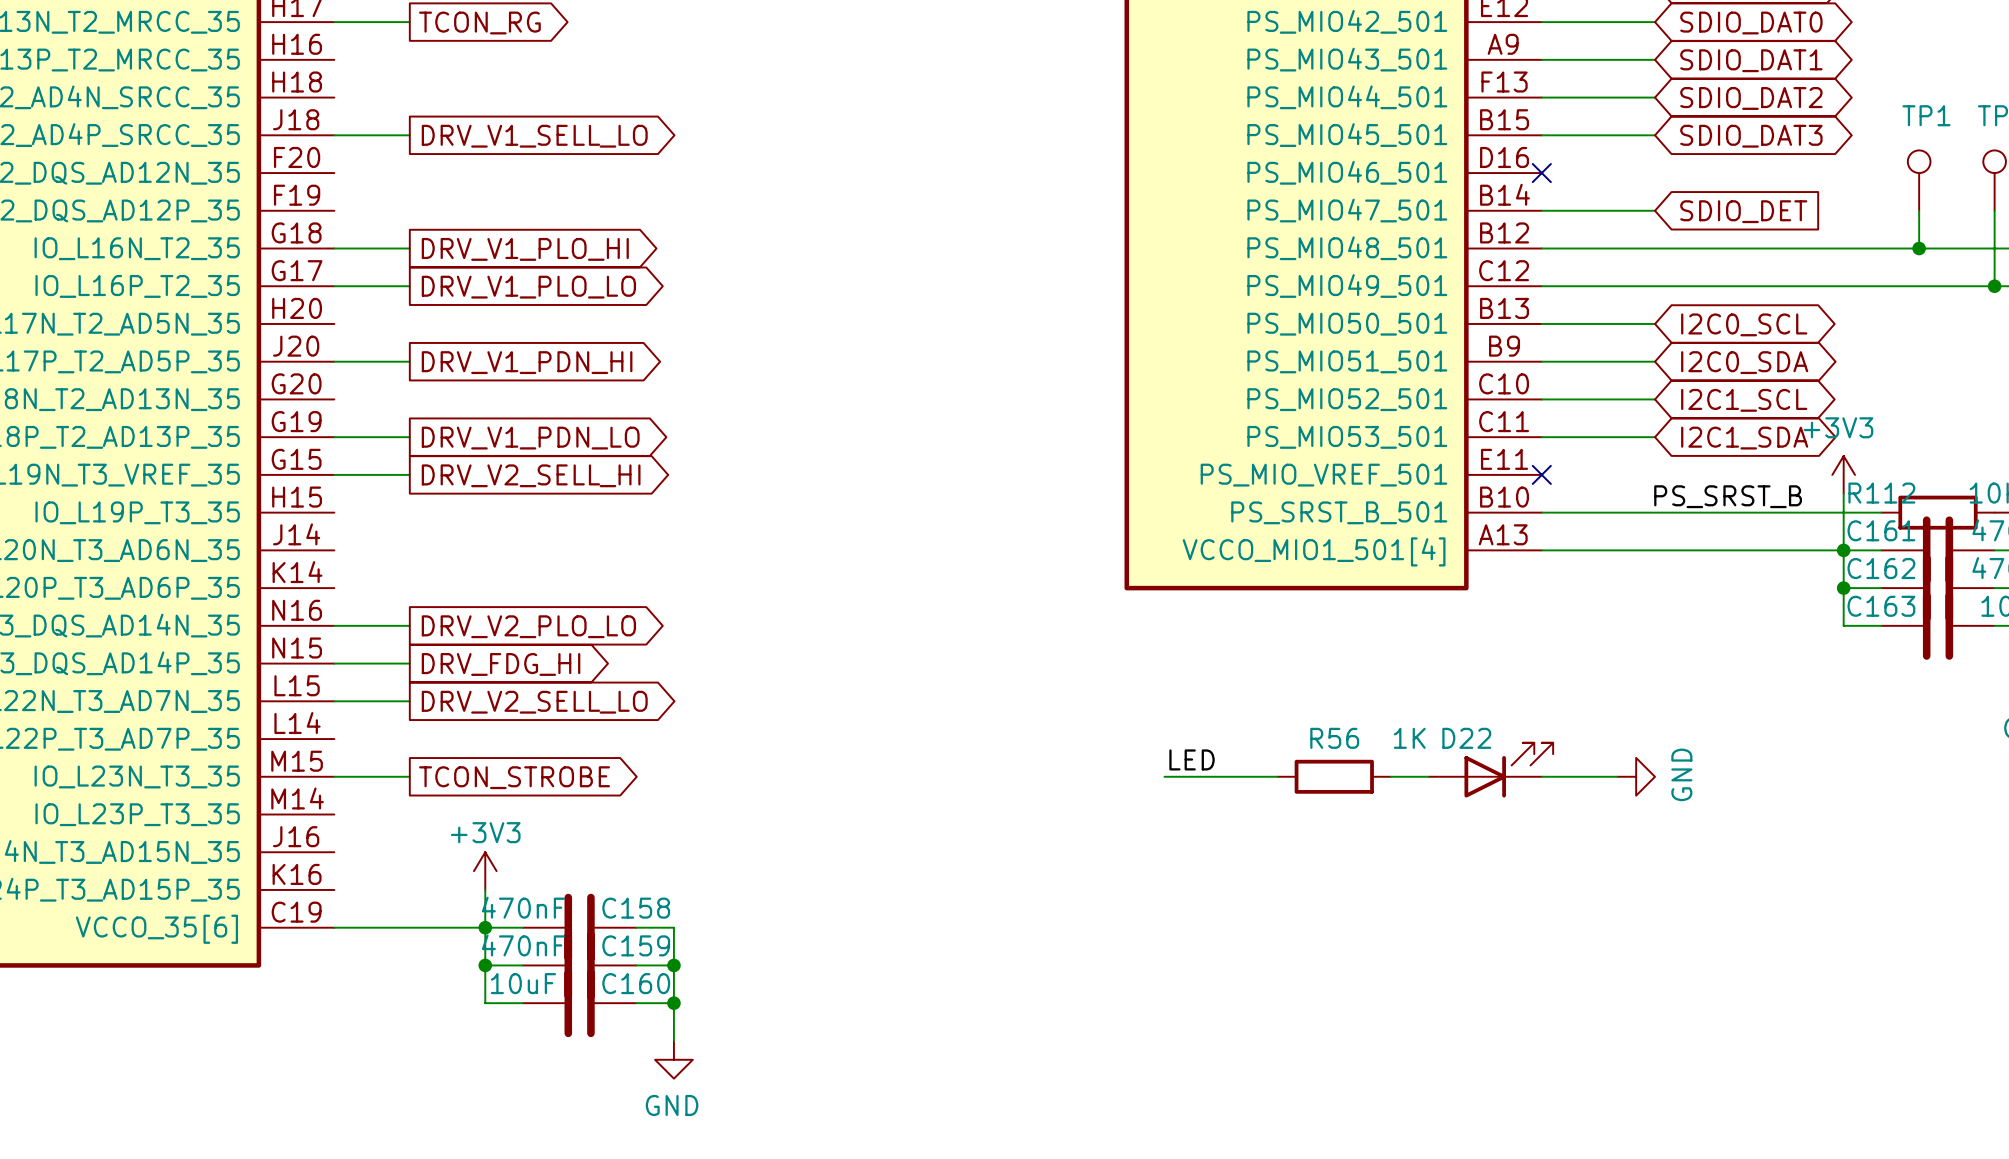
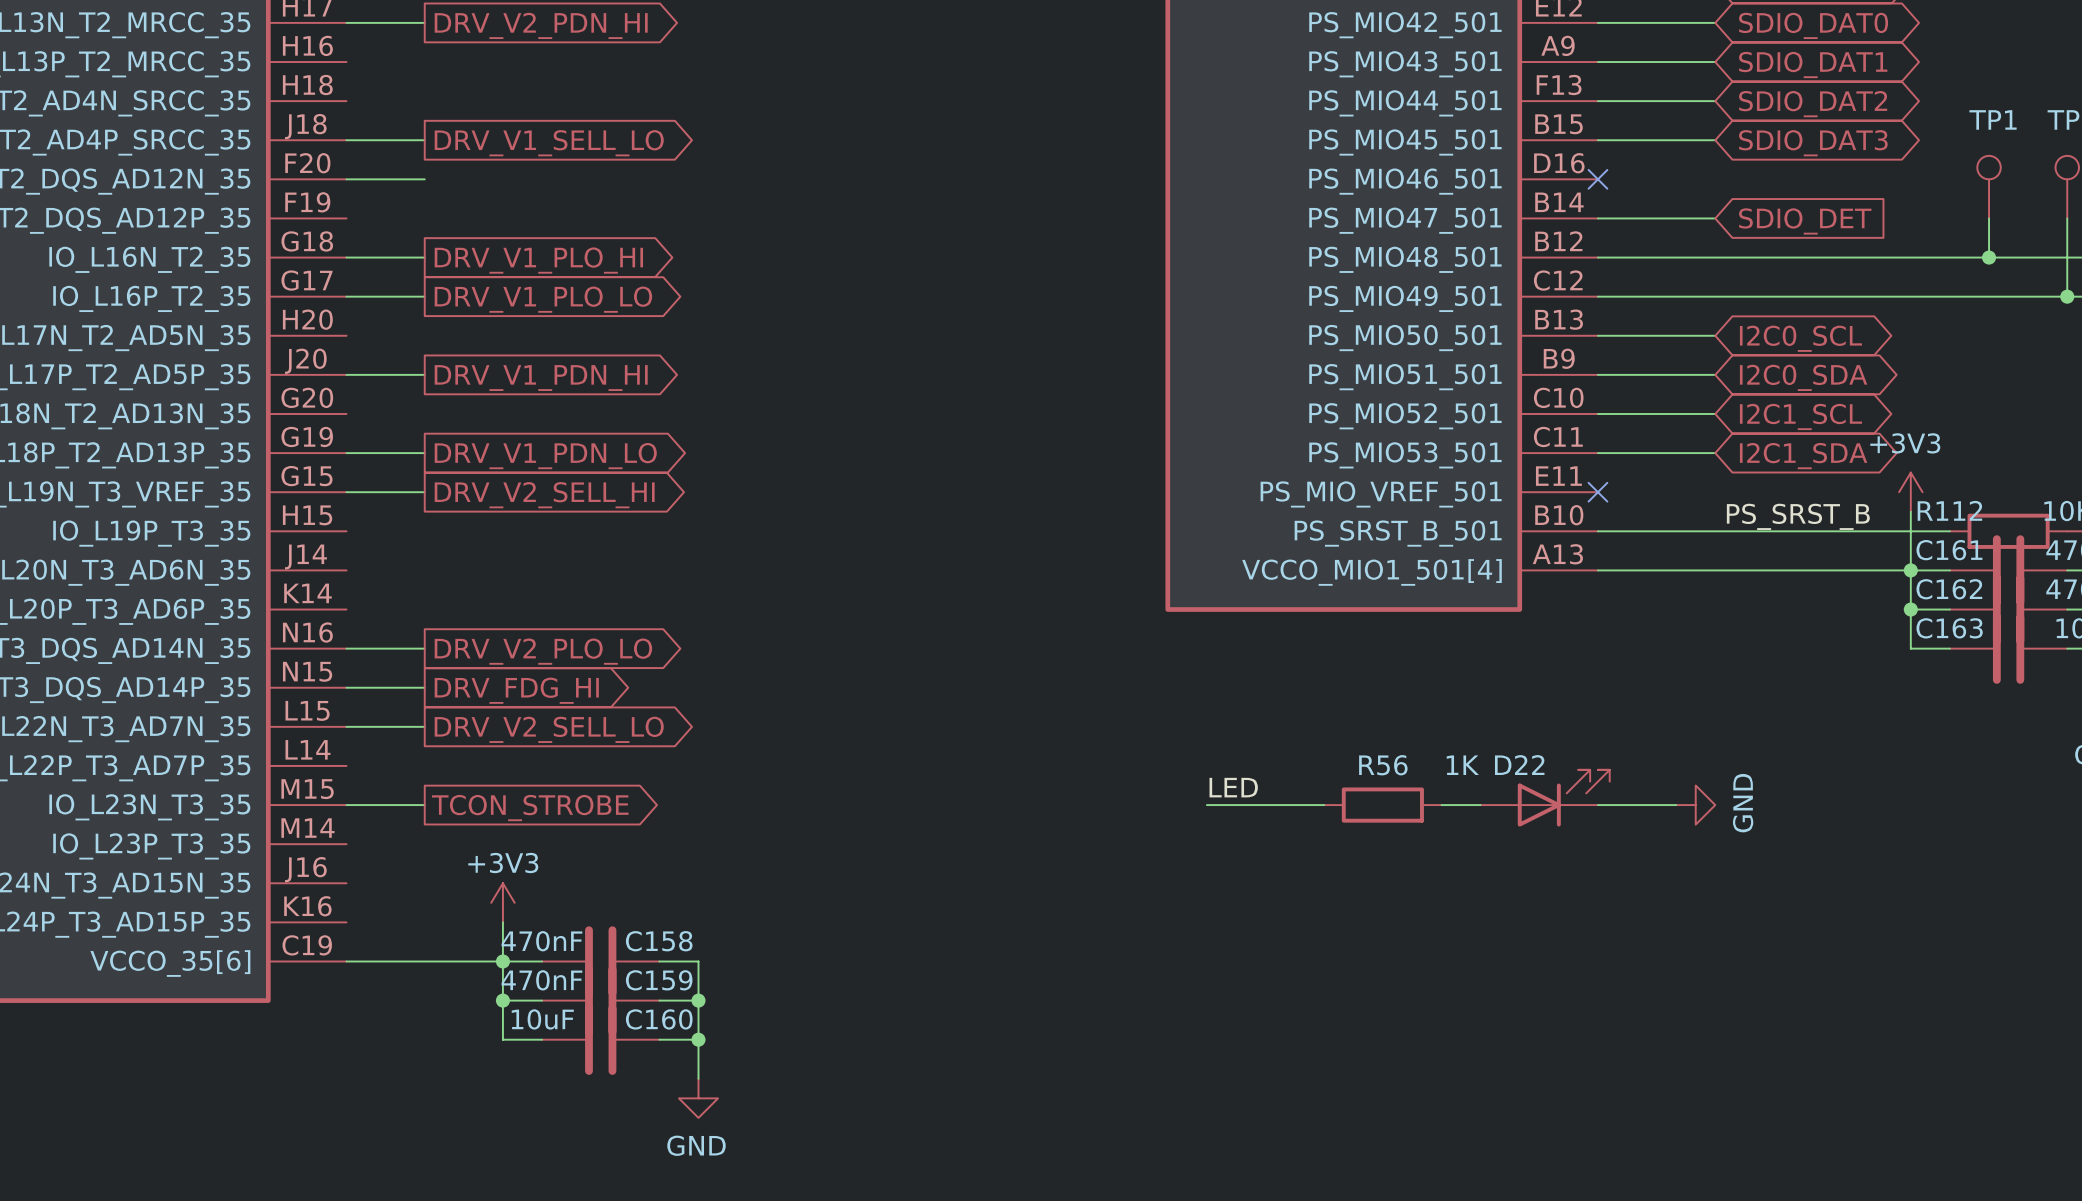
global label: TCON_RG (479, 23) -> DRV_V2_PDN_HI (541, 25)
wire: none -> (346, 179) (424, 179)

